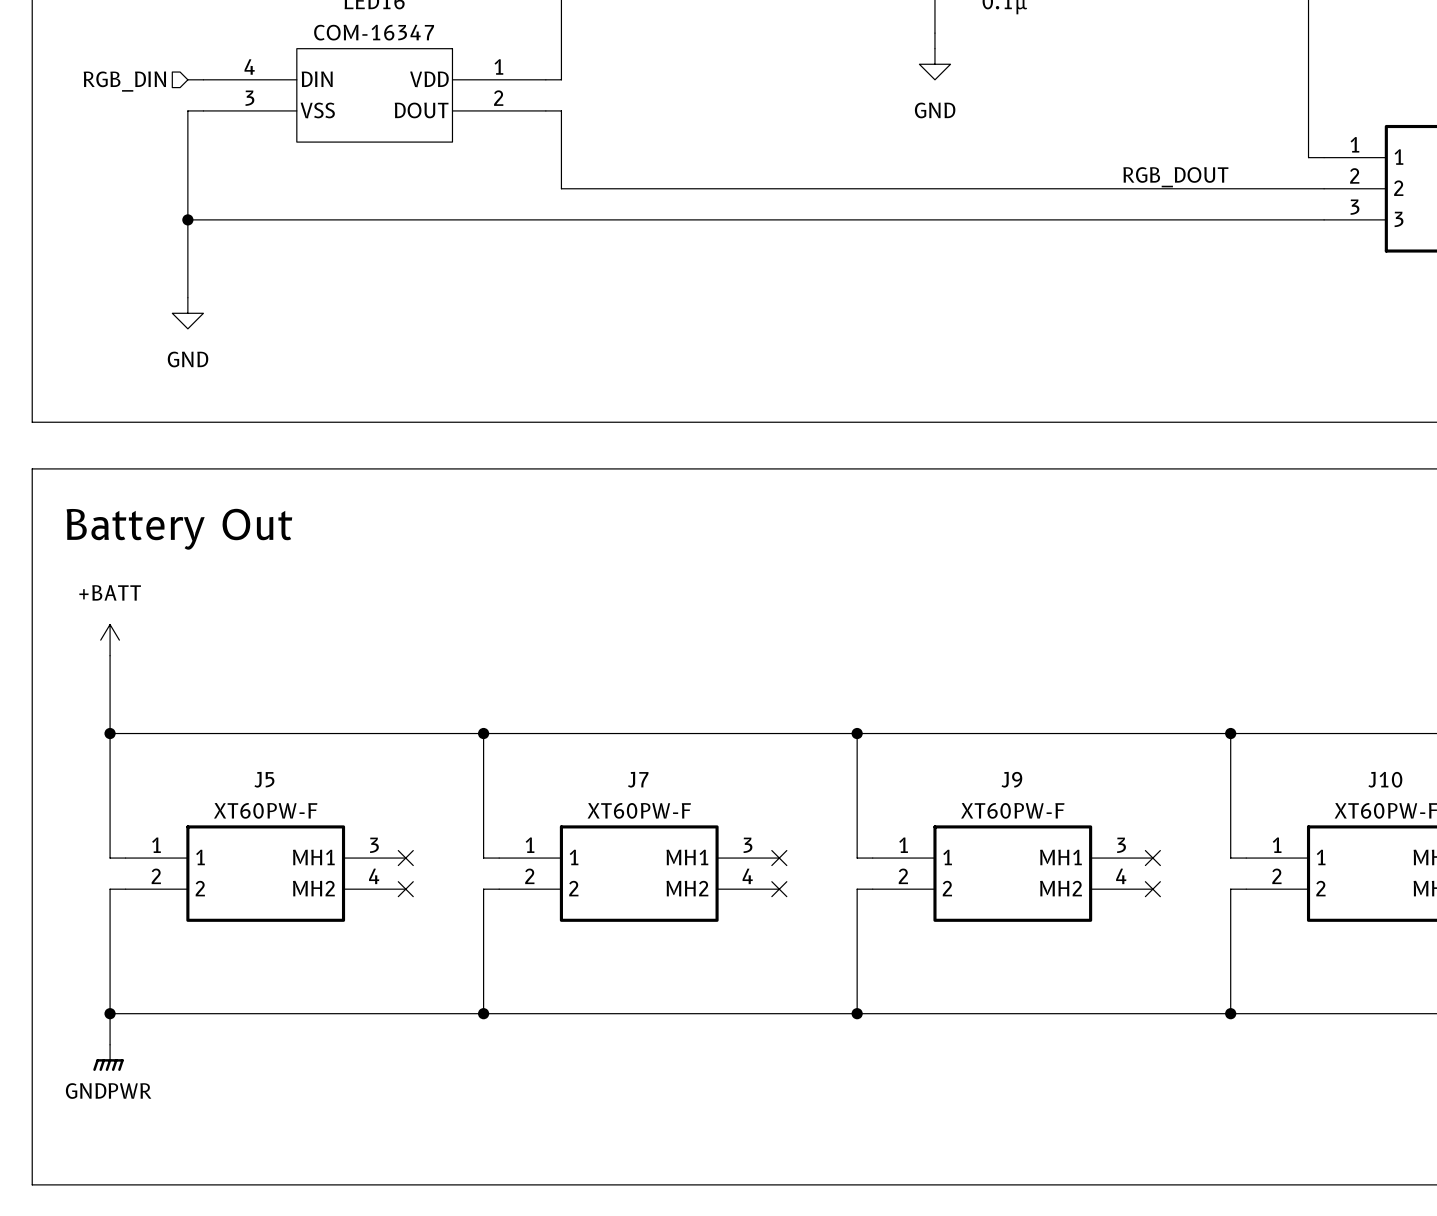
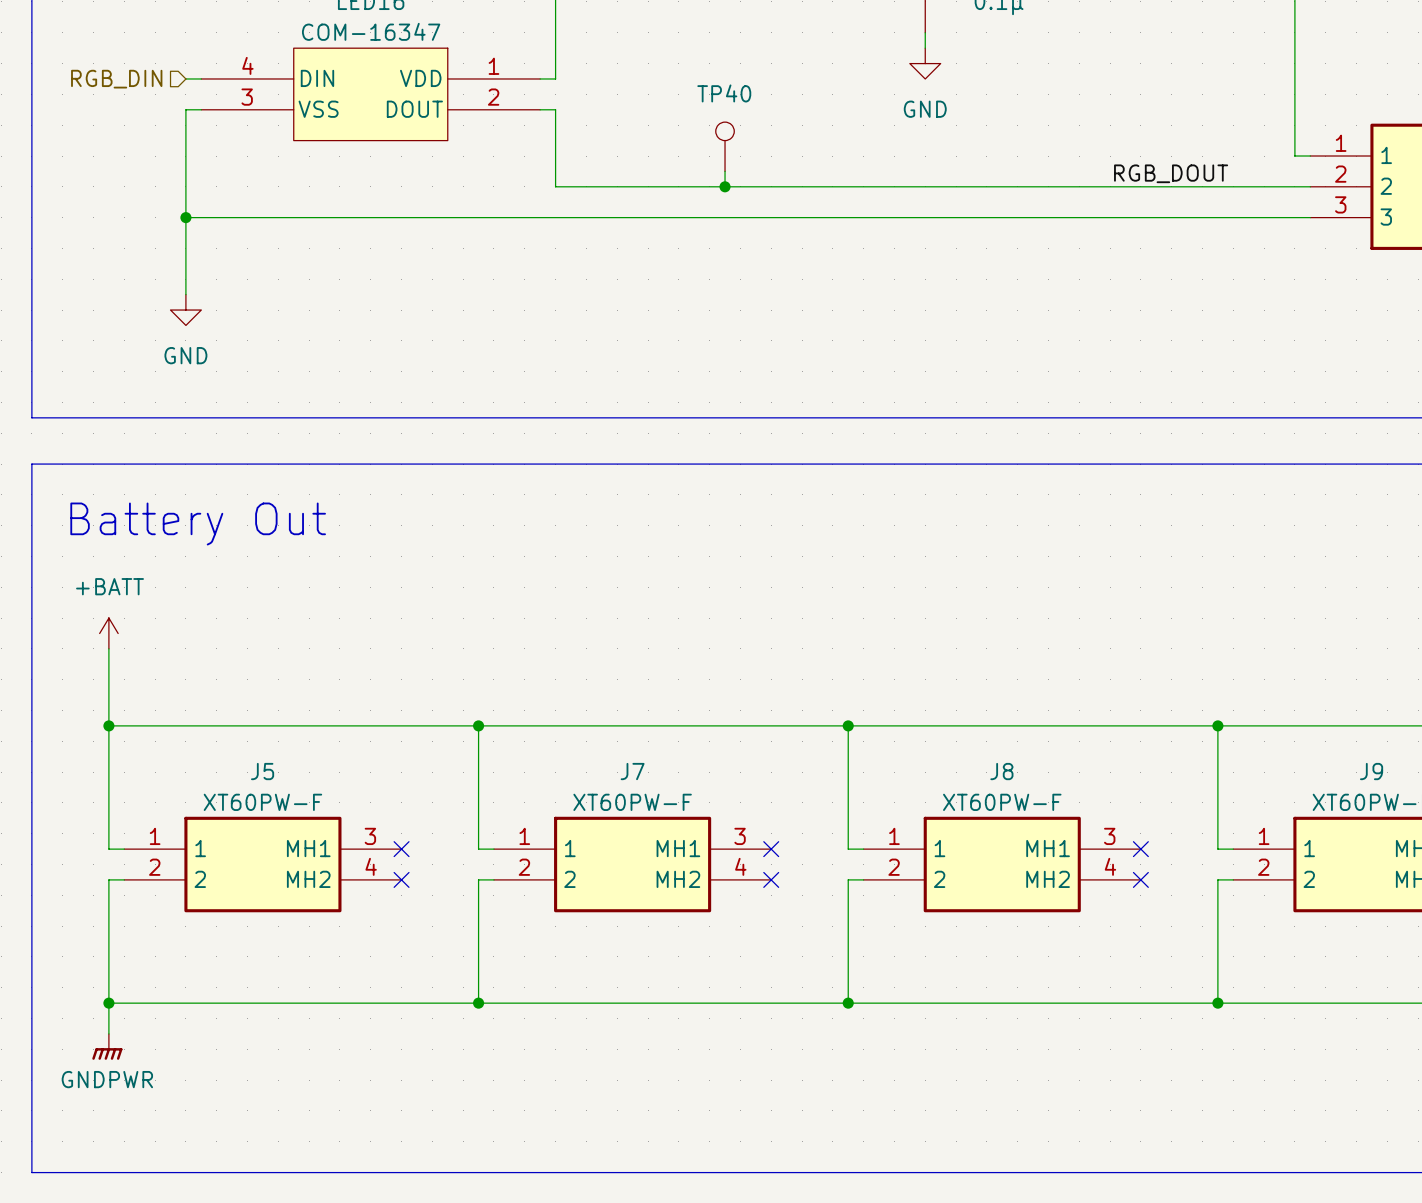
TP40: none -> (725, 146)
wire: none -> (725, 171) (725, 186)
junction: none -> (725, 186)
J9 name: J9 (1011, 779) -> J8 (1001, 771)
J10 name: J10 (1385, 779) -> J9 (1371, 771)

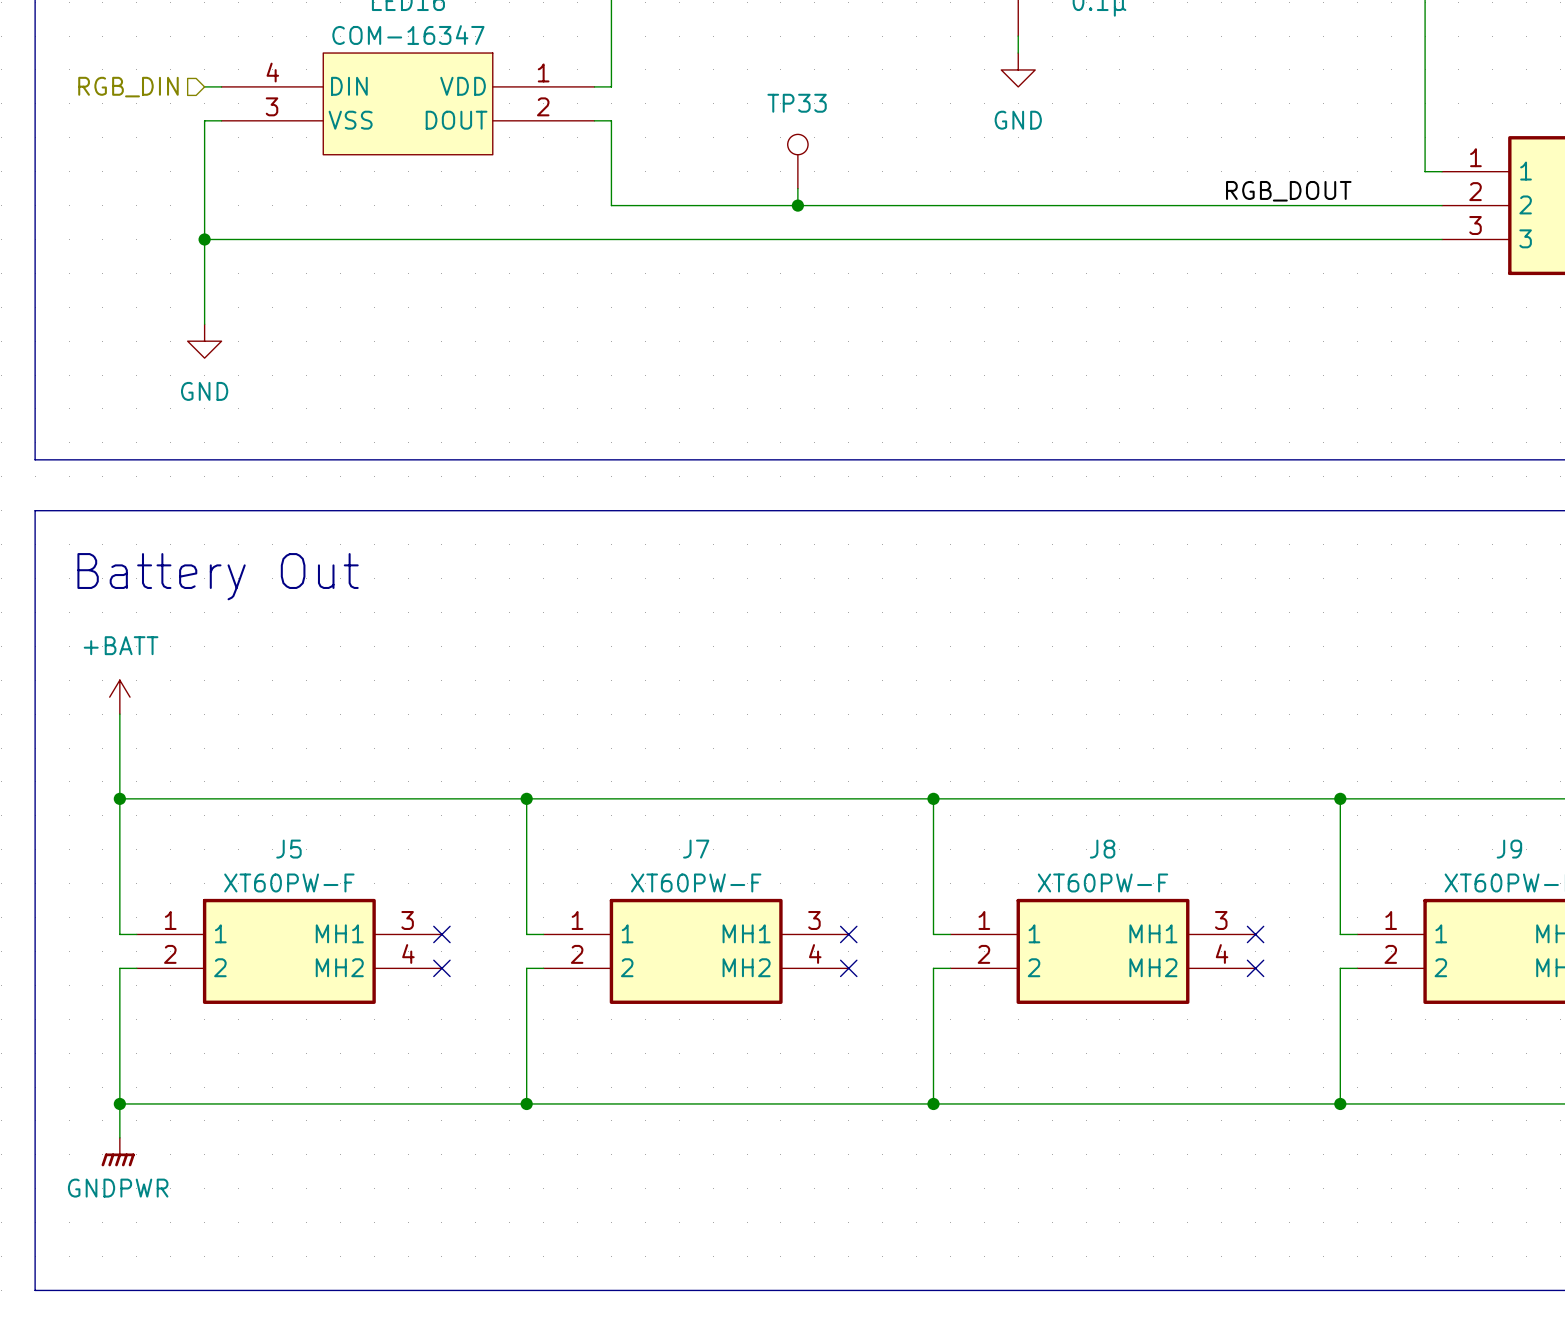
TP40 name: TP40 (724, 93) -> TP33 (797, 103)

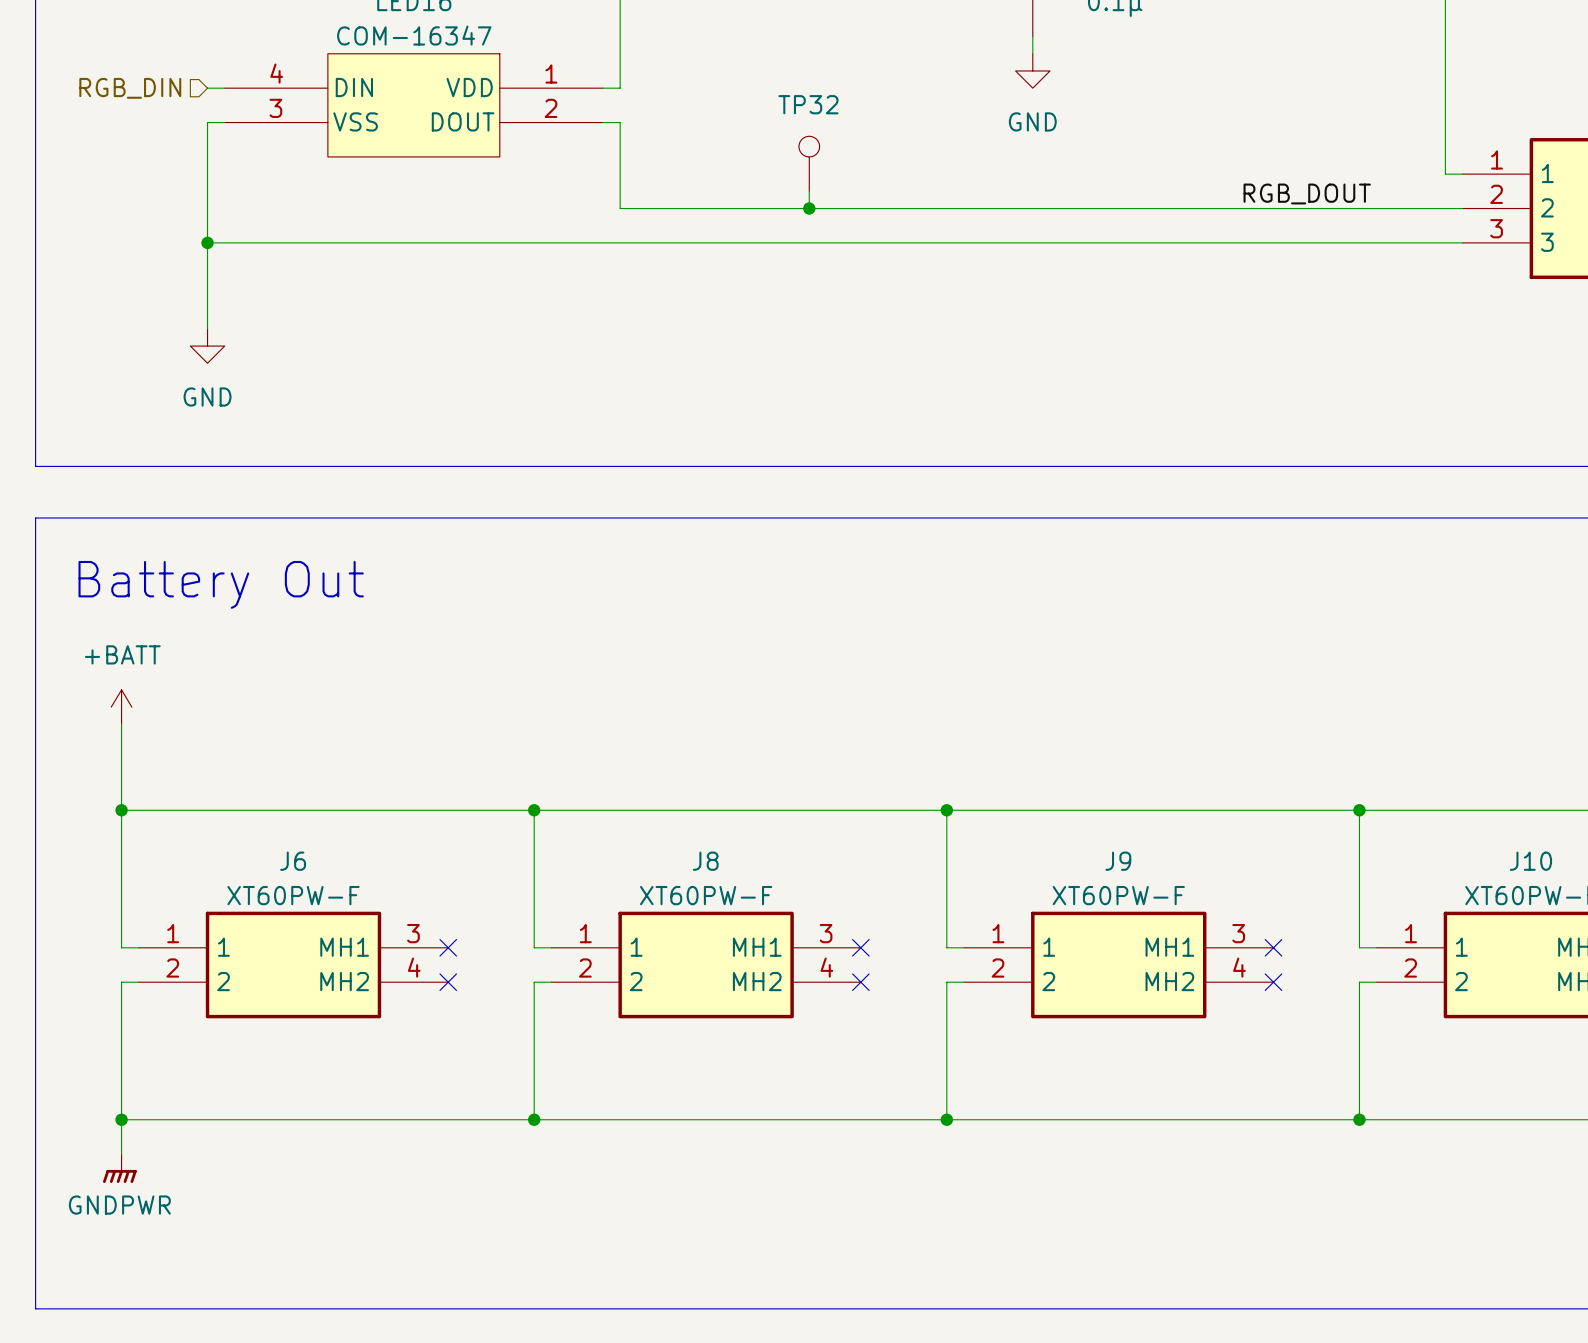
TP33 name: TP33 (797, 103) -> TP32 (808, 104)
J5 name: J5 (288, 849) -> J6 (293, 861)
J7 name: J7 (696, 849) -> J8 (705, 861)
J8 name: J8 (1102, 849) -> J9 (1118, 861)
J9 name: J9 (1509, 849) -> J10 (1530, 861)

